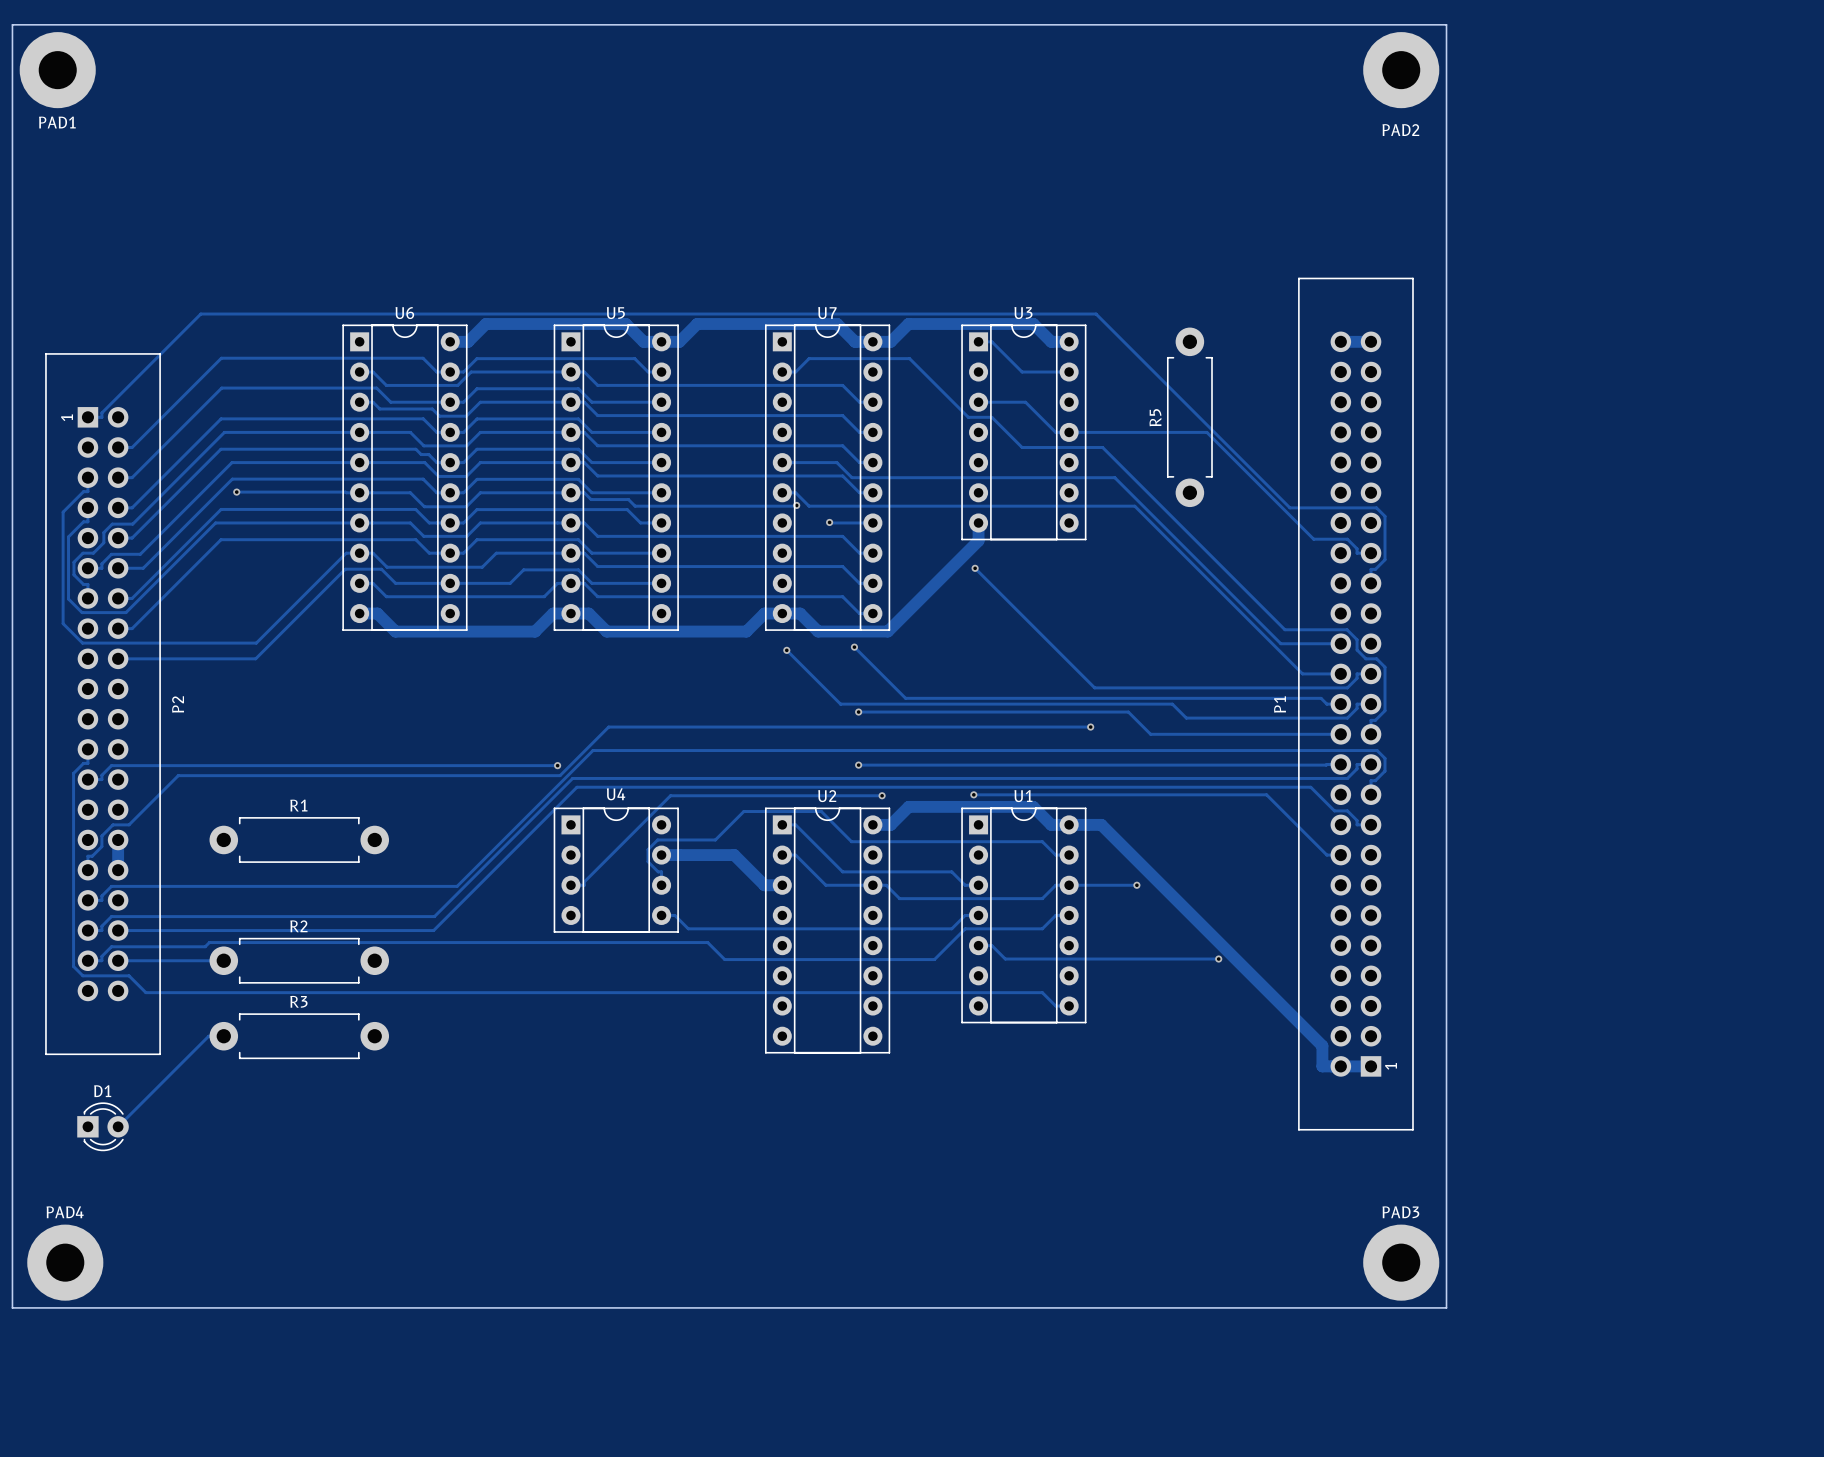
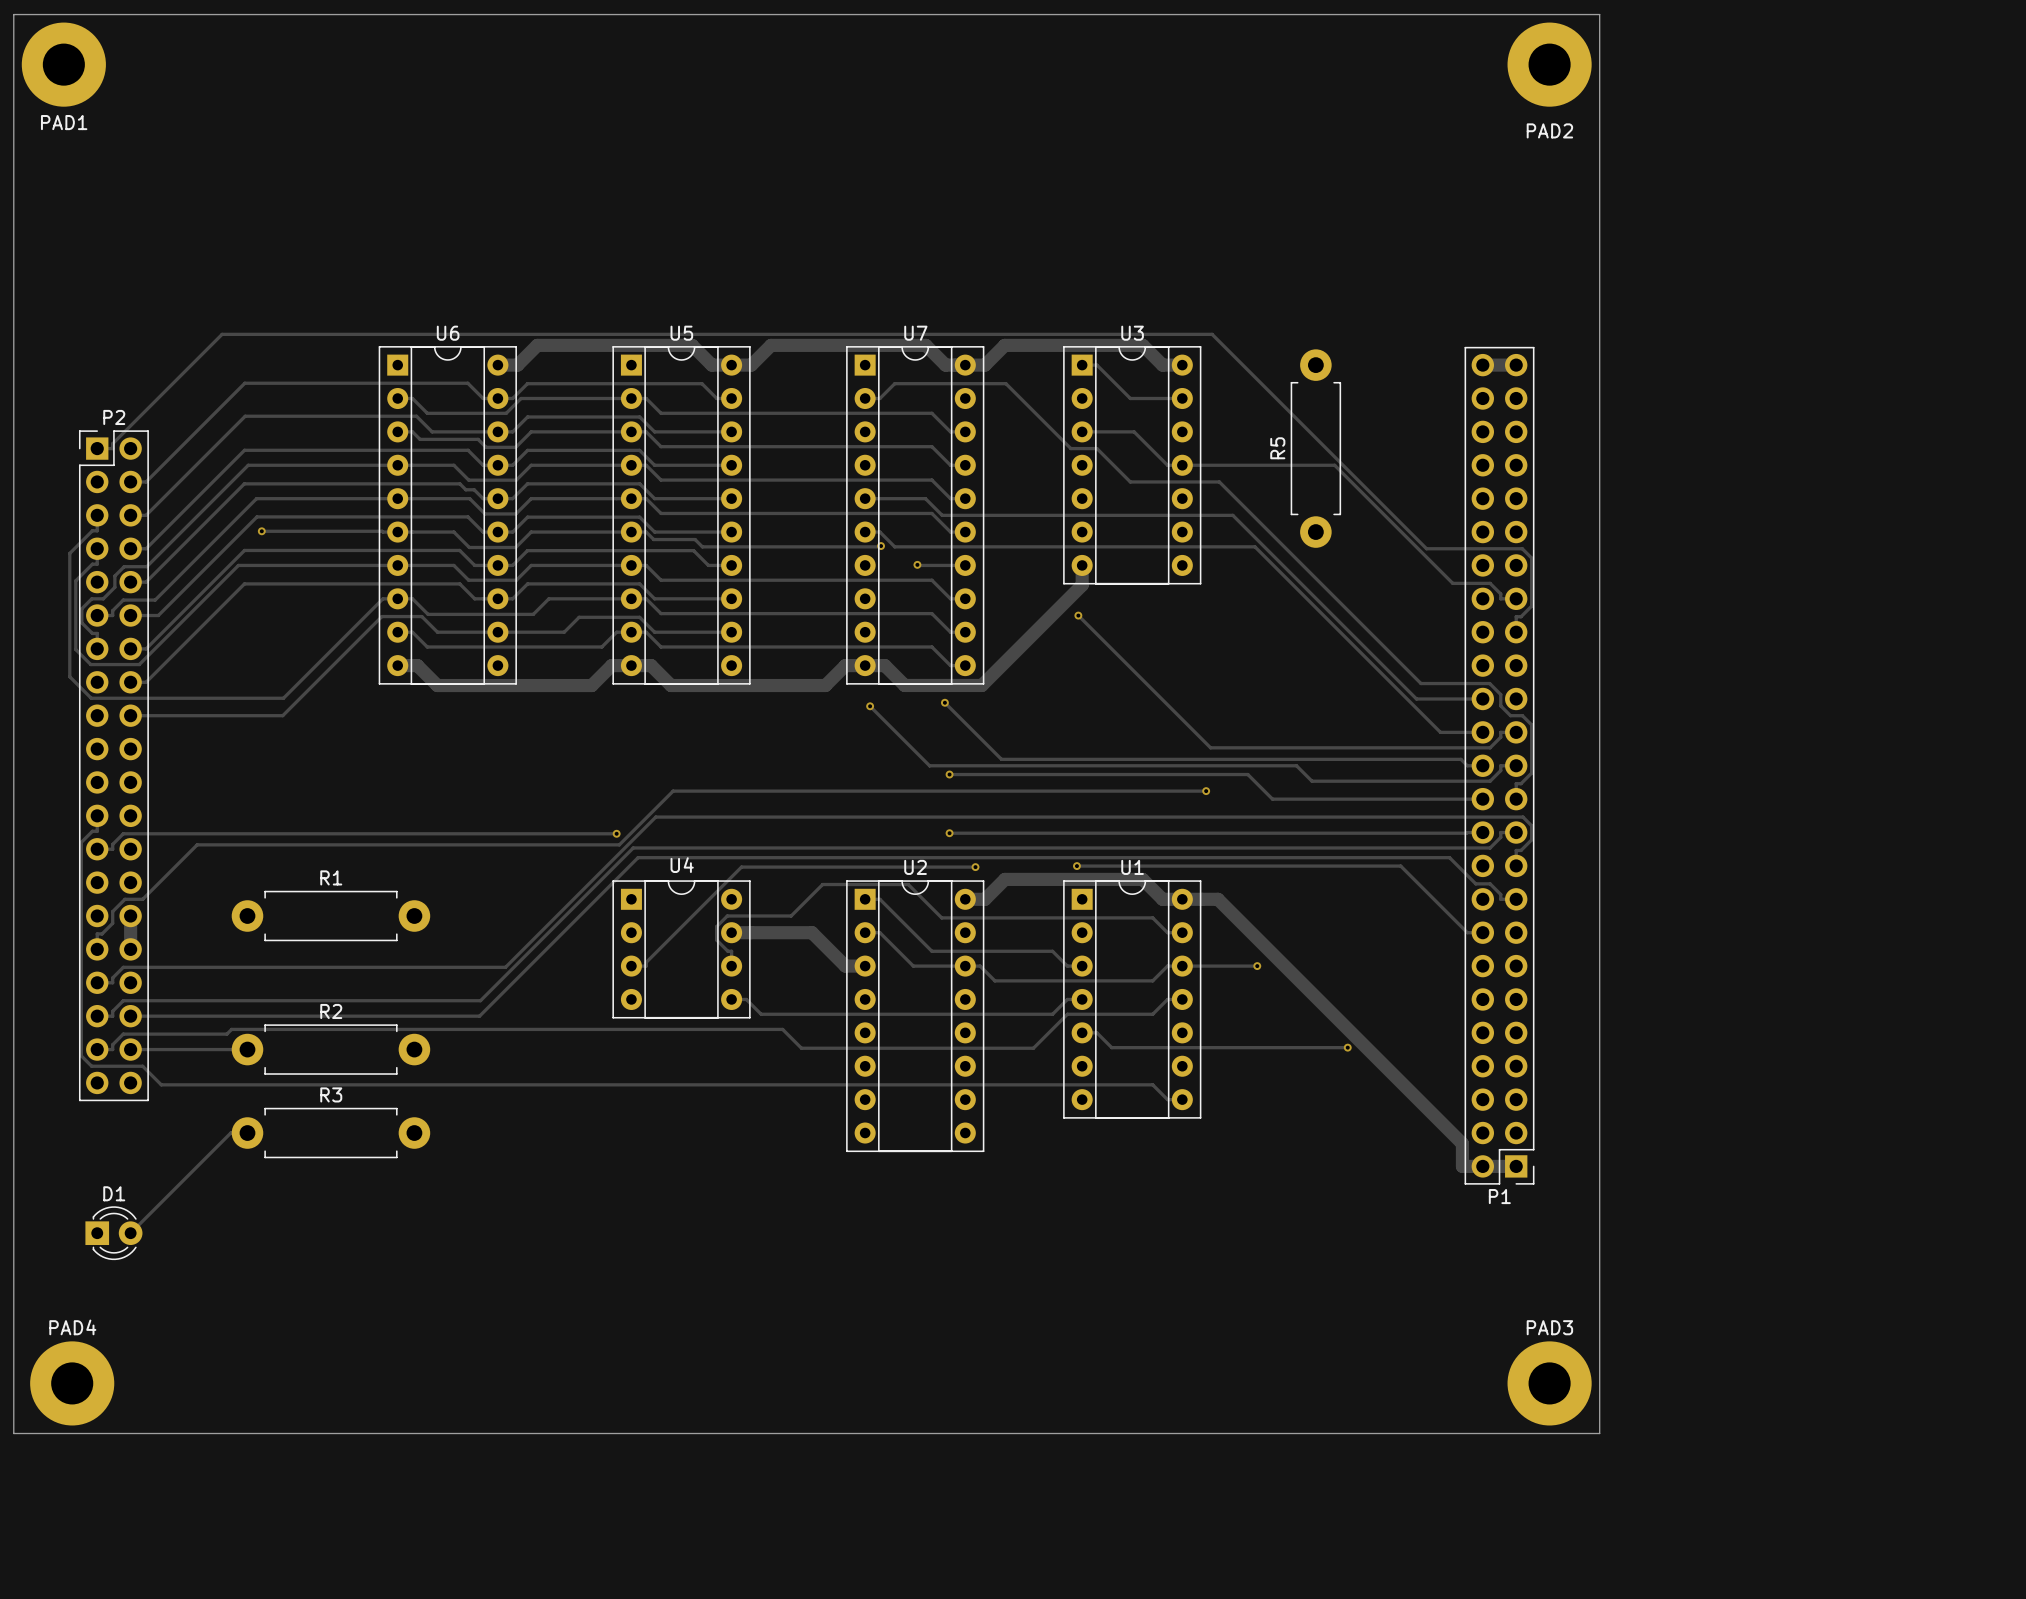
P1 footprint: [1298, 277, 1414, 1131] -> [1464, 346, 1535, 1185]
P2 footprint: [45, 353, 161, 1056] -> [78, 430, 149, 1102]
P2 name position: P2 (178, 704) -> P2 (114, 417)
P1 name position: P1 (1280, 704) -> P1 (1499, 1196)

